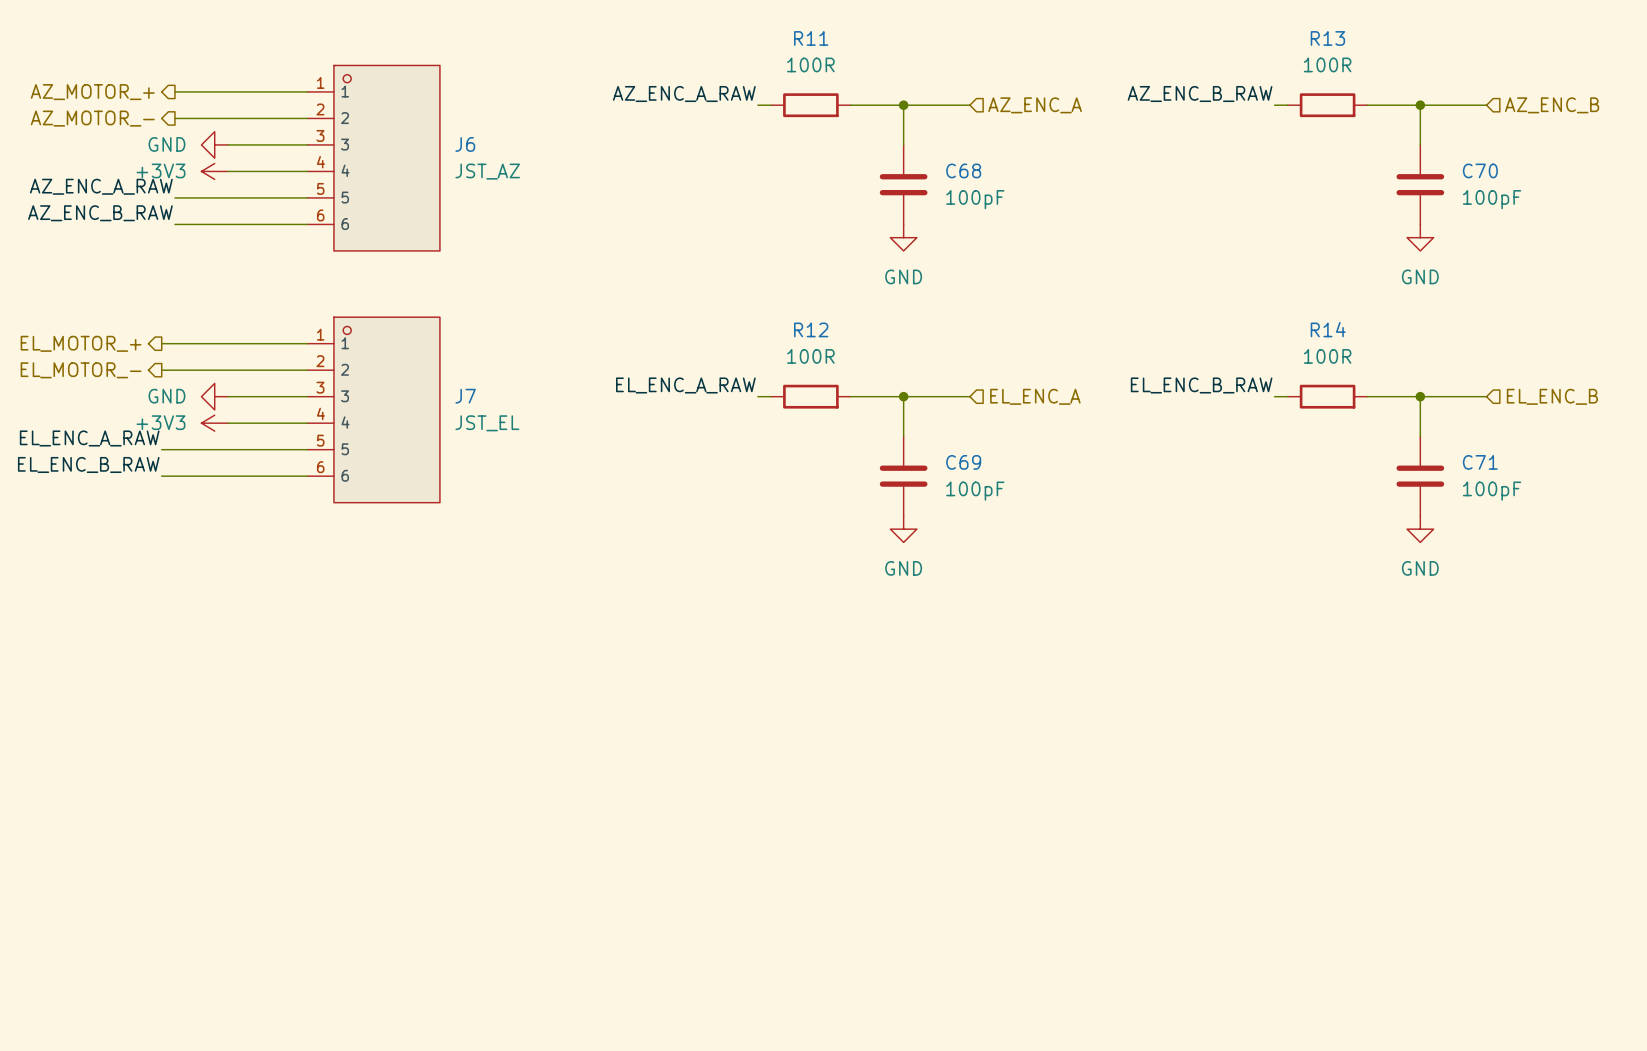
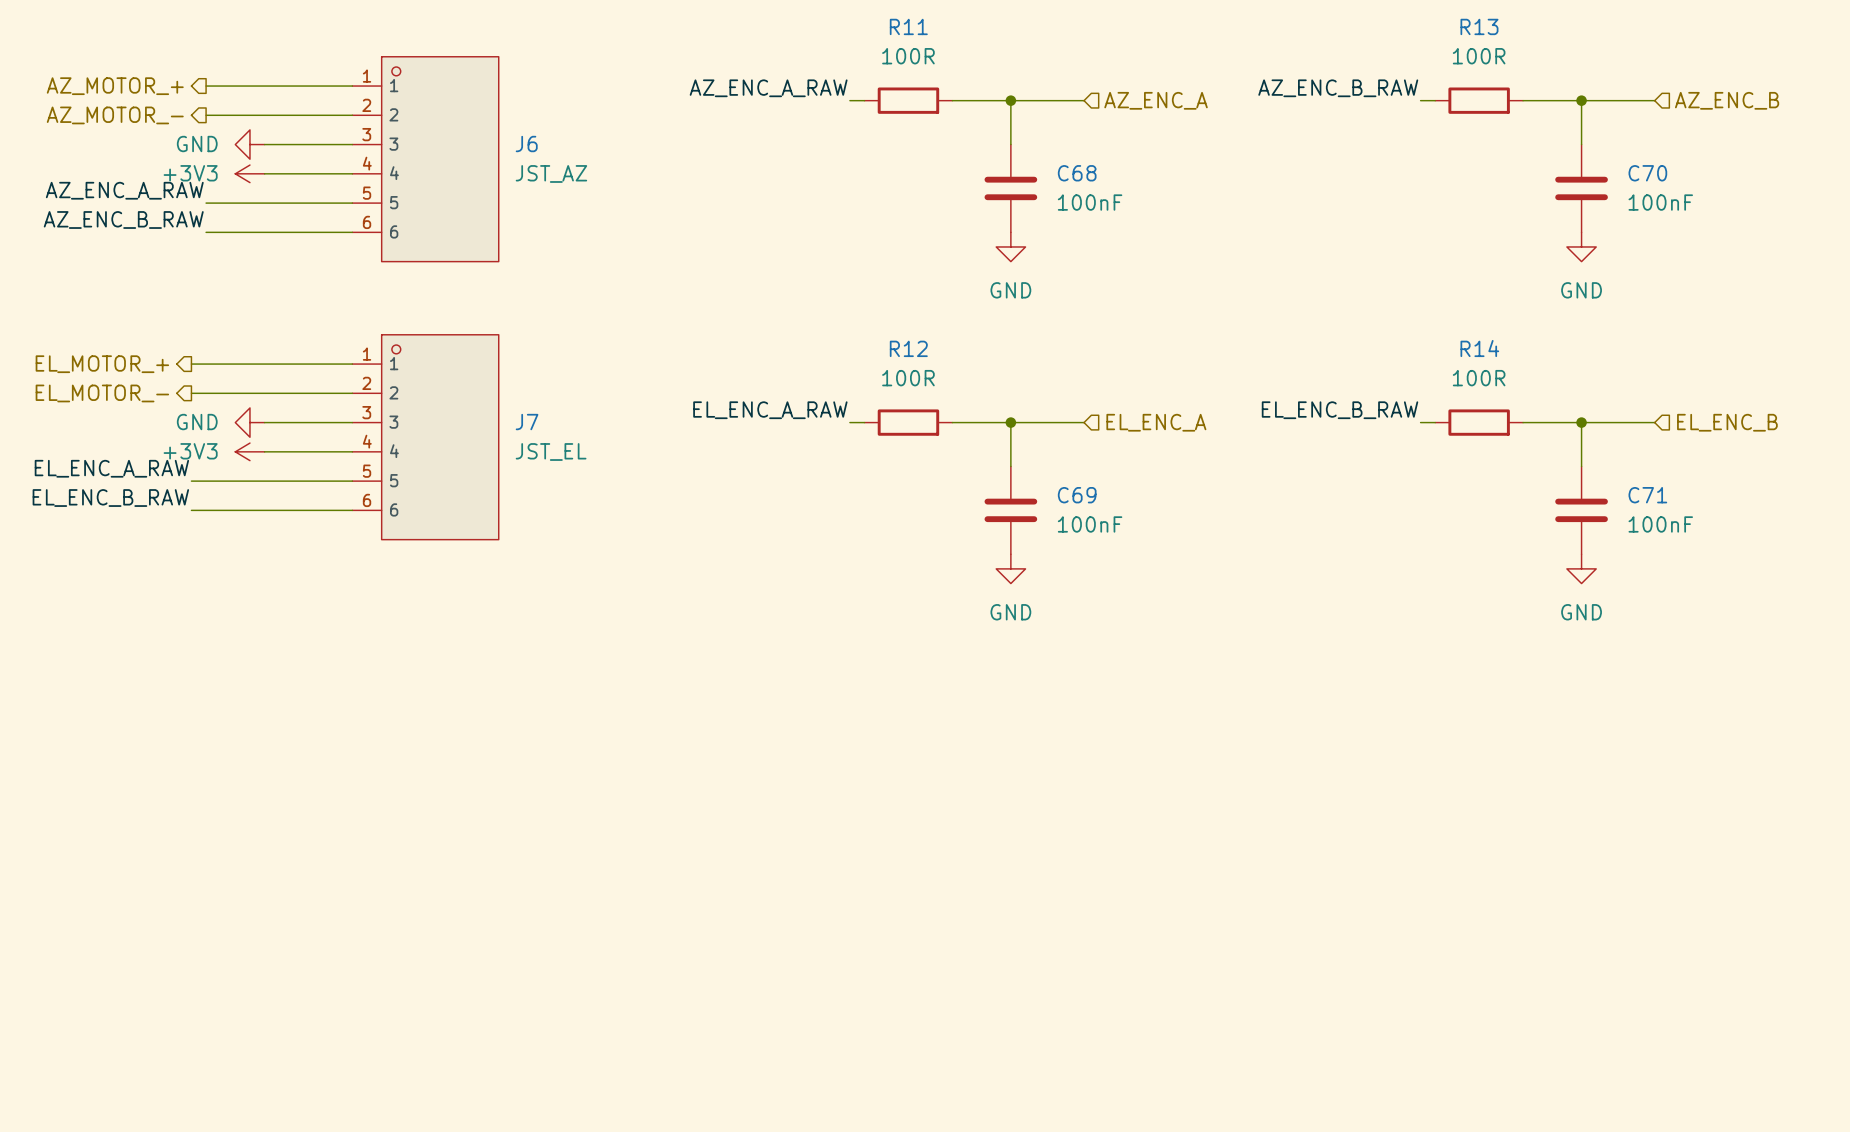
C68 value: 100pF (975, 199) -> 100nF (1090, 202)
C70 value: 100pF (1492, 199) -> 100nF (1660, 202)
C69 value: 100pF (975, 491) -> 100nF (1090, 524)
C71 value: 100pF (1492, 491) -> 100nF (1660, 524)

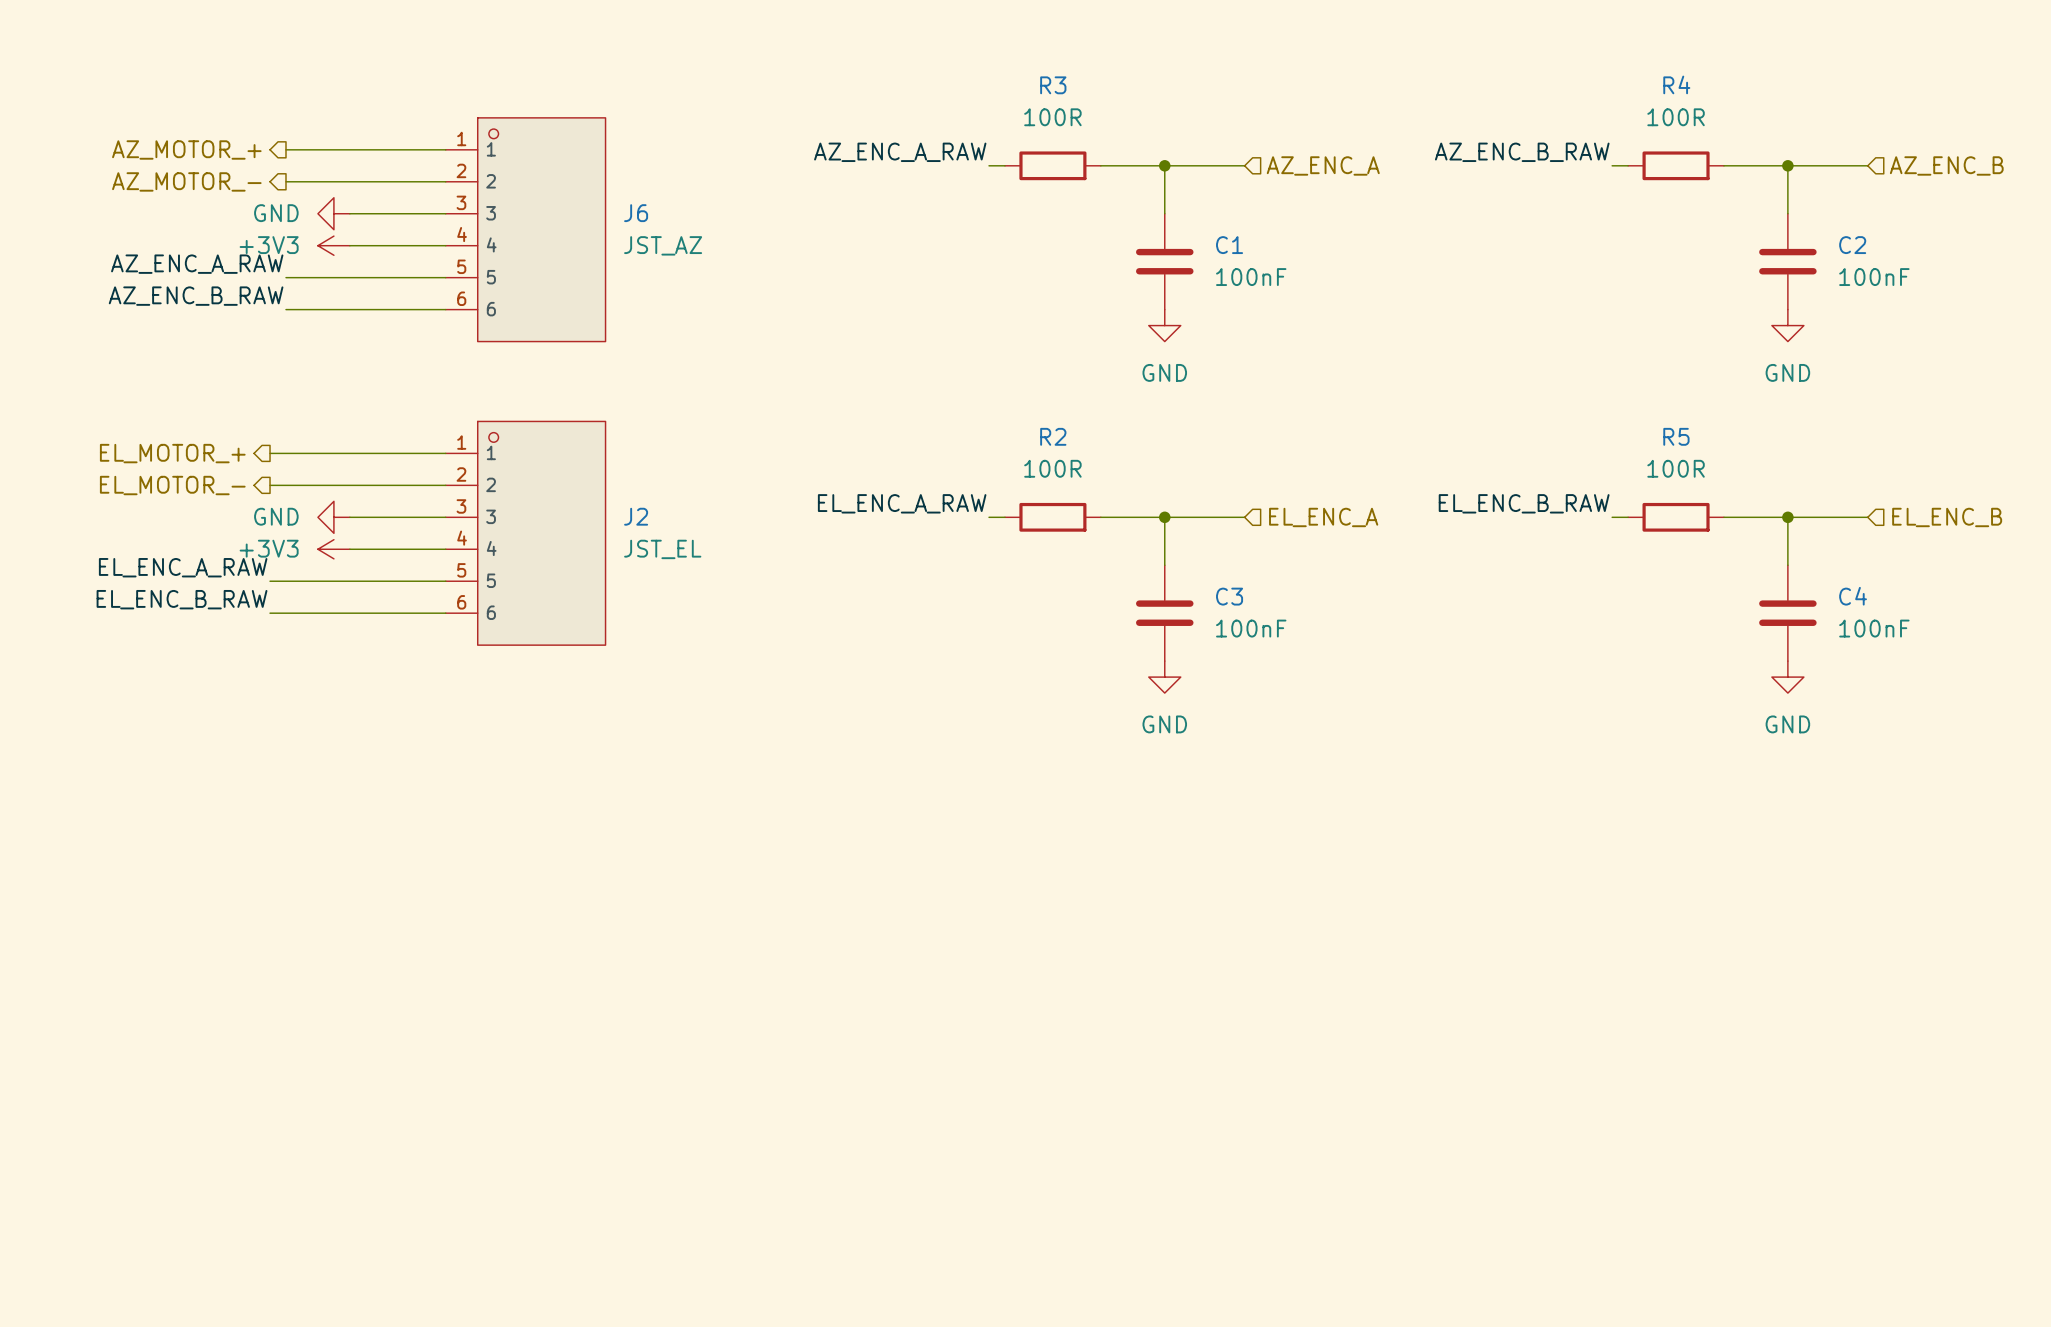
R11 name: R11 (908, 26) -> R3 (1053, 85)
R13 name: R13 (1479, 26) -> R4 (1676, 84)
C68 name: C68 (1077, 173) -> C1 (1229, 245)
C70 name: C70 (1647, 173) -> C2 (1852, 245)
R12 name: R12 (908, 348) -> R2 (1053, 436)
R14 name: R14 (1479, 348) -> R5 (1676, 436)
J7 name: J7 (527, 422) -> J2 (636, 516)
C69 name: C69 (1077, 495) -> C3 (1229, 596)
C71 name: C71 (1647, 495) -> C4 (1853, 596)

